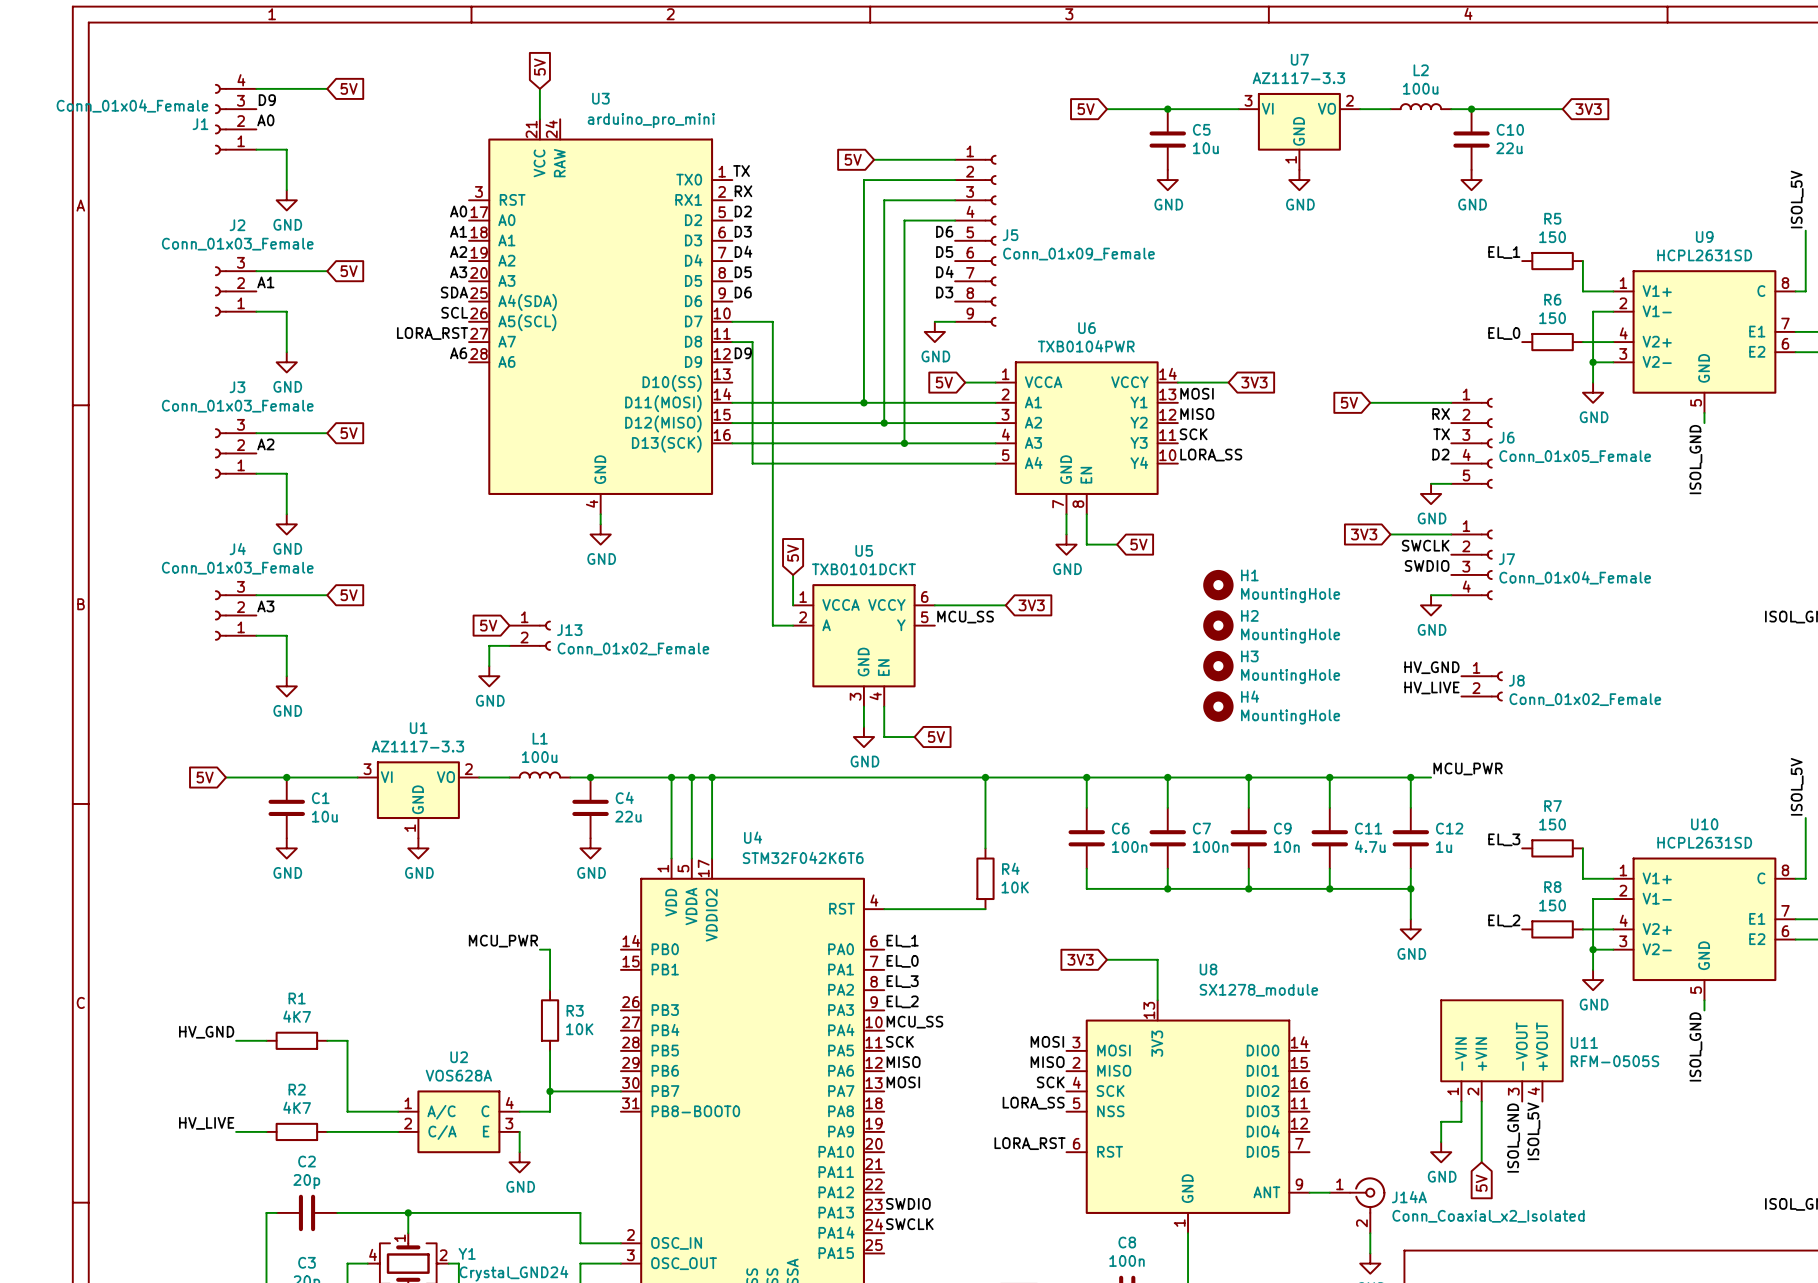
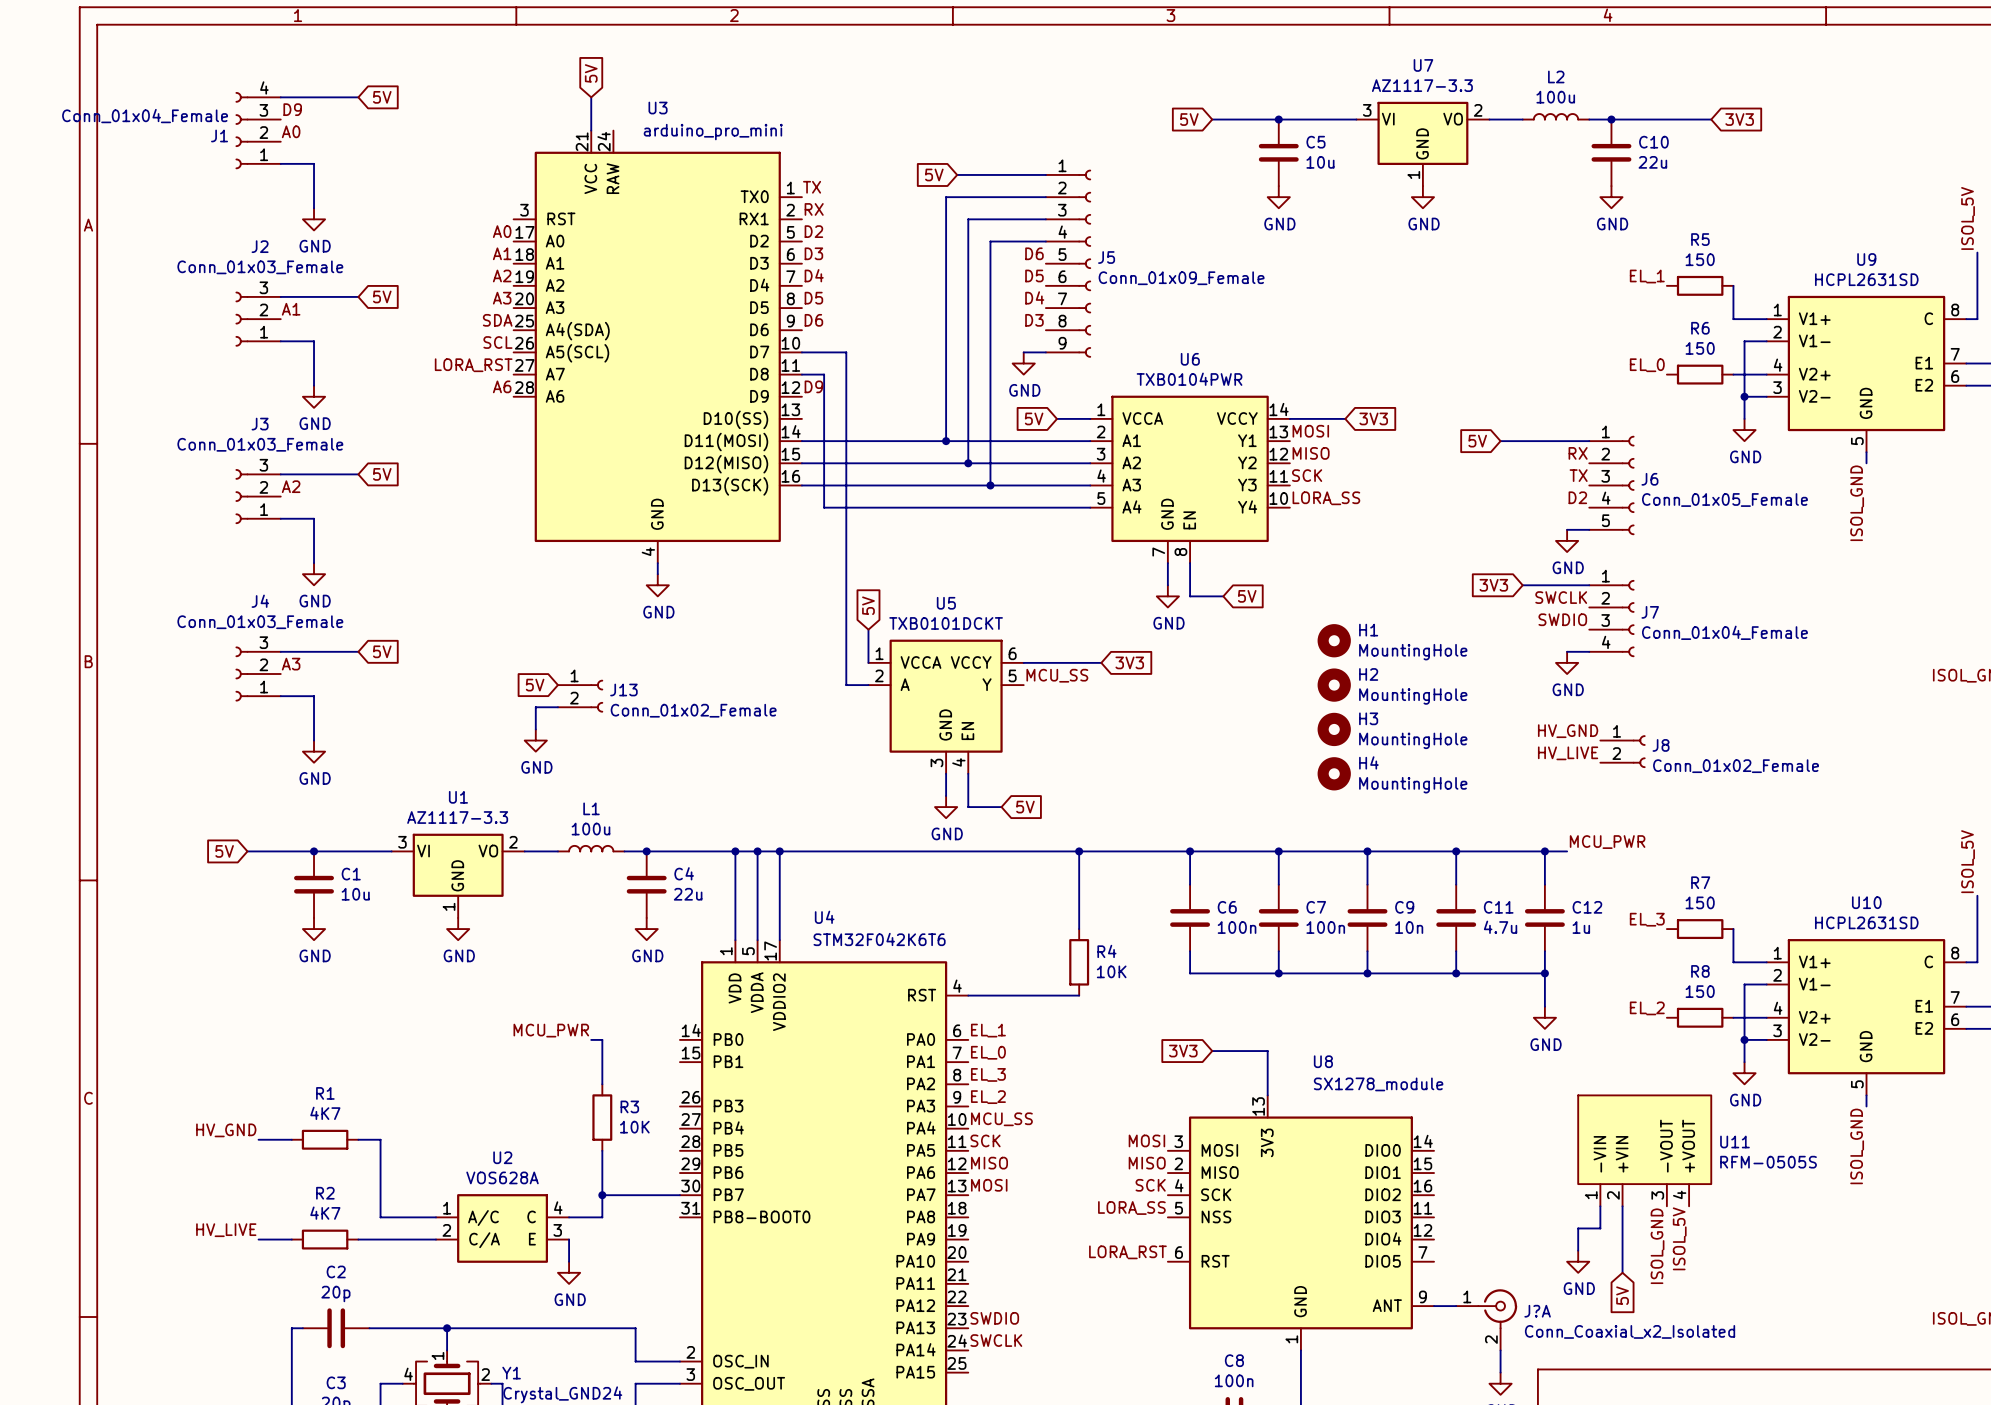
J14A name: J14A (1409, 1197) -> J?A (1537, 1311)

